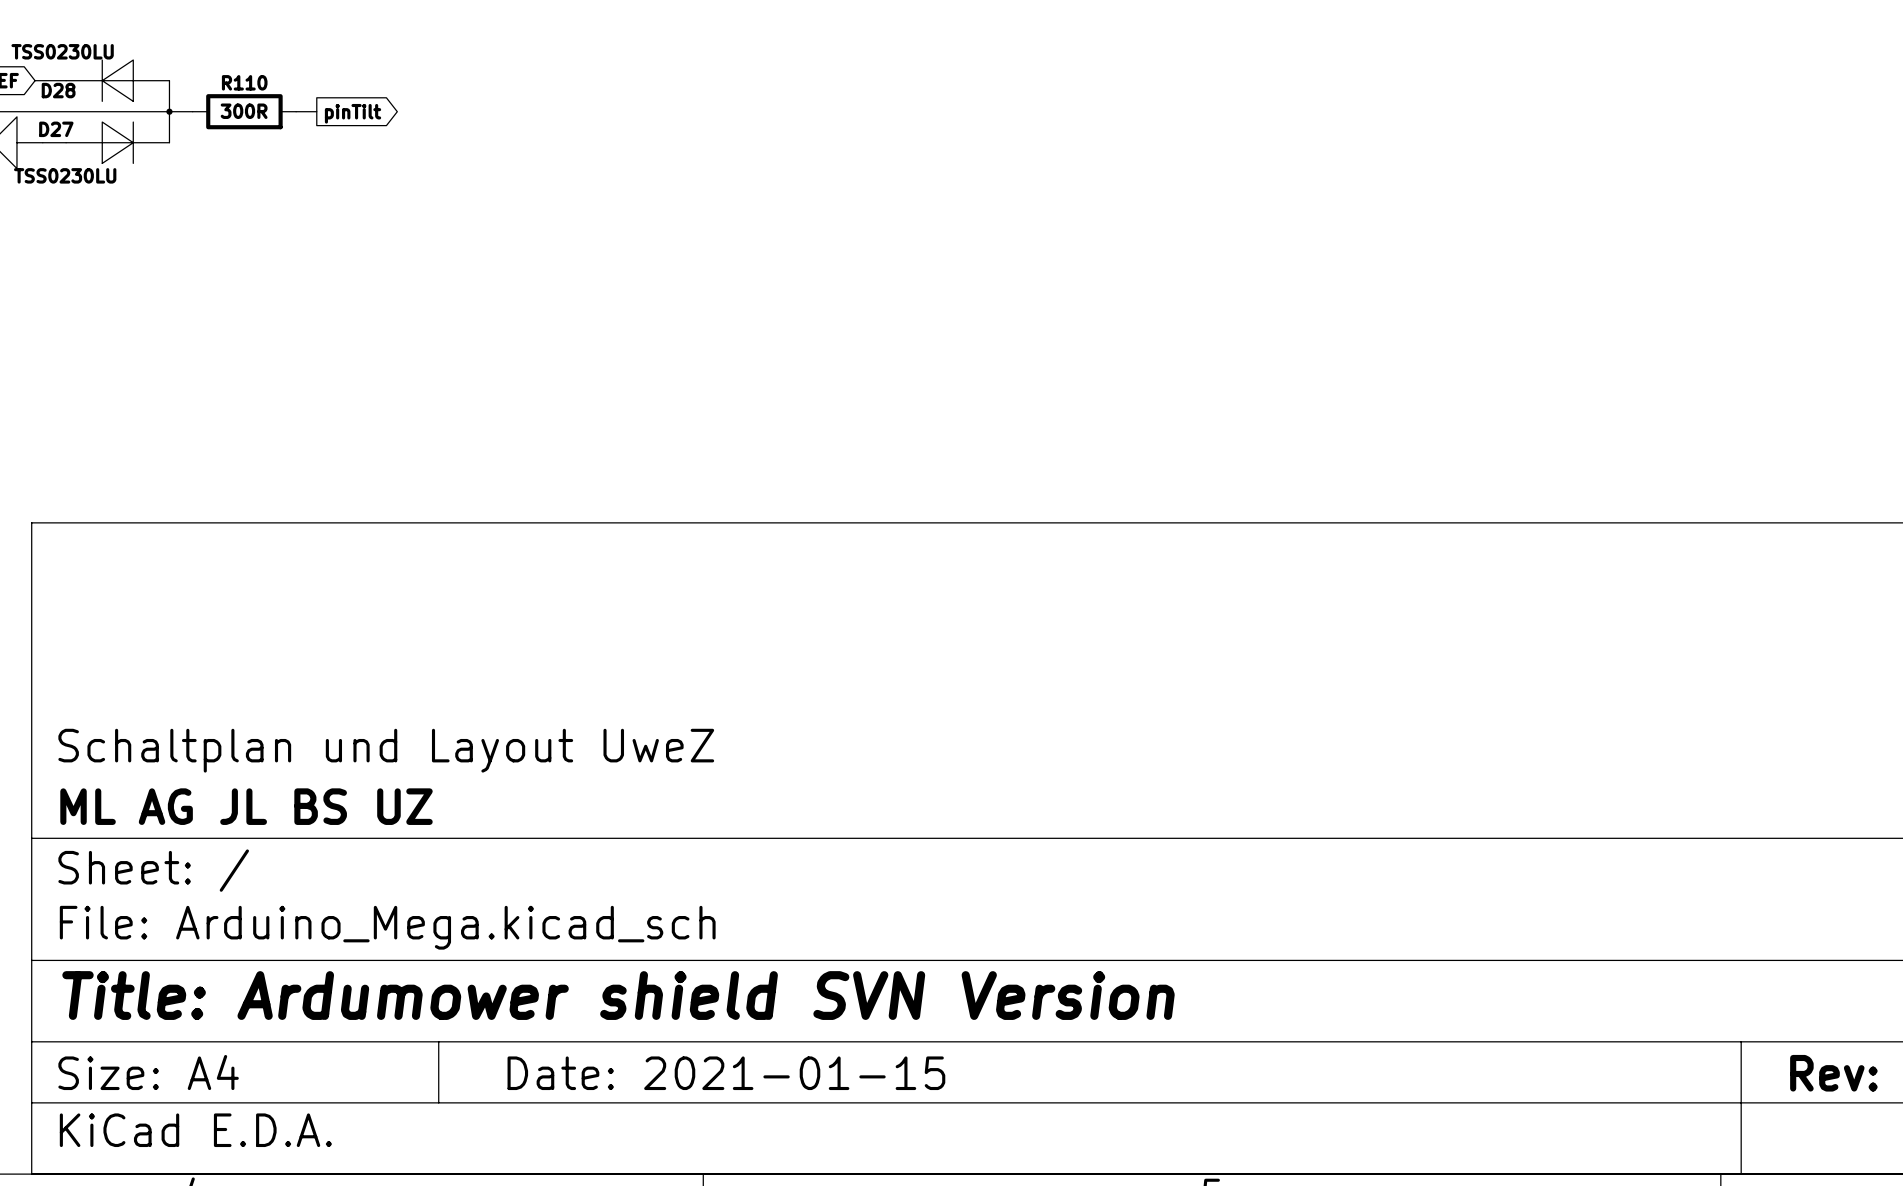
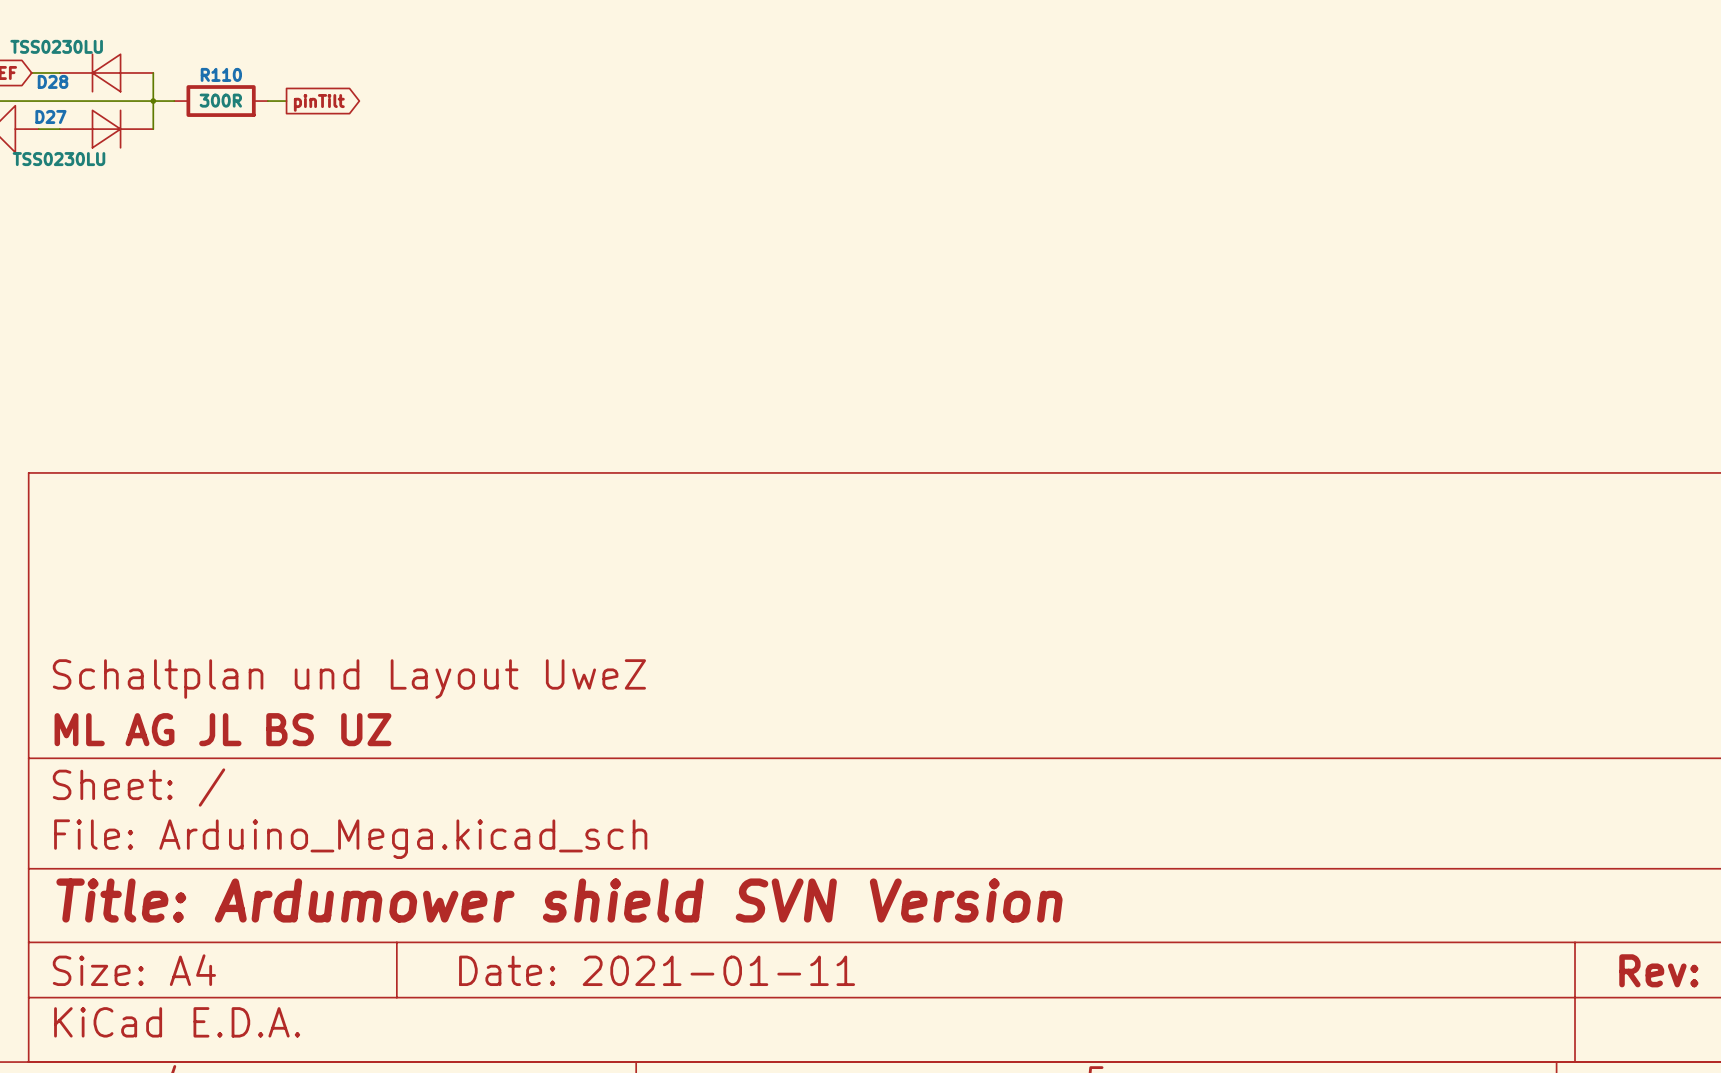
title block: Date: 2021-01-15 (726, 1073) -> Date: 2021-01-11 (657, 970)

